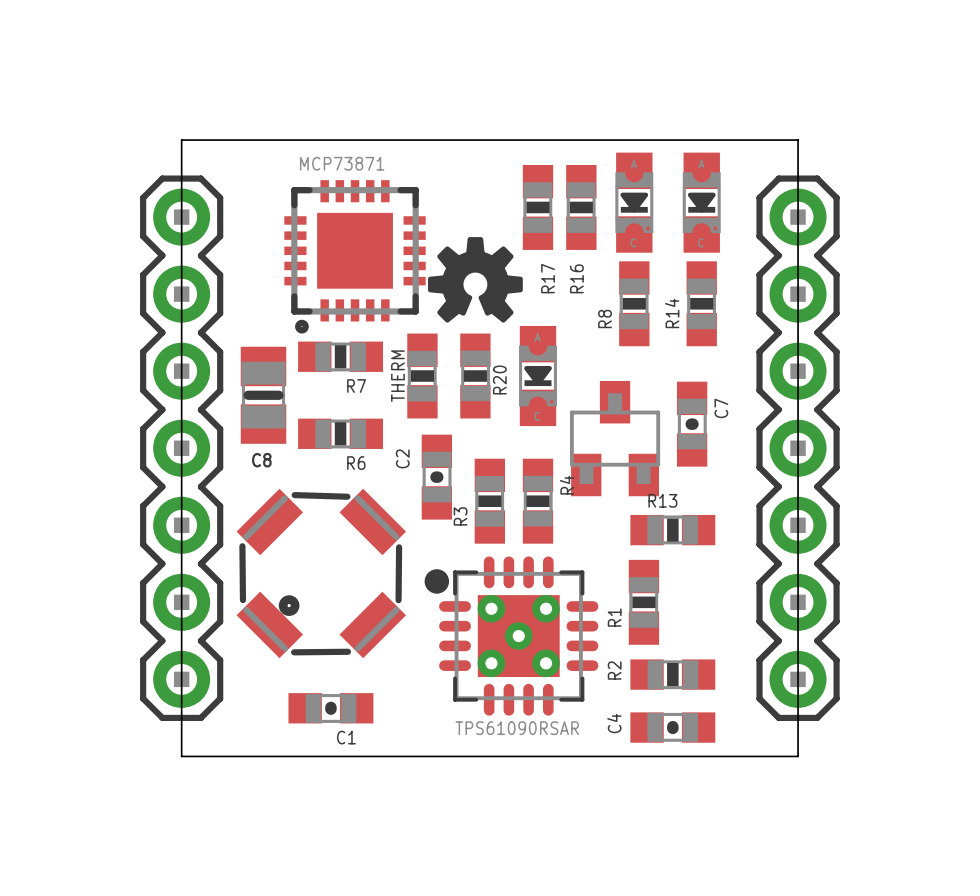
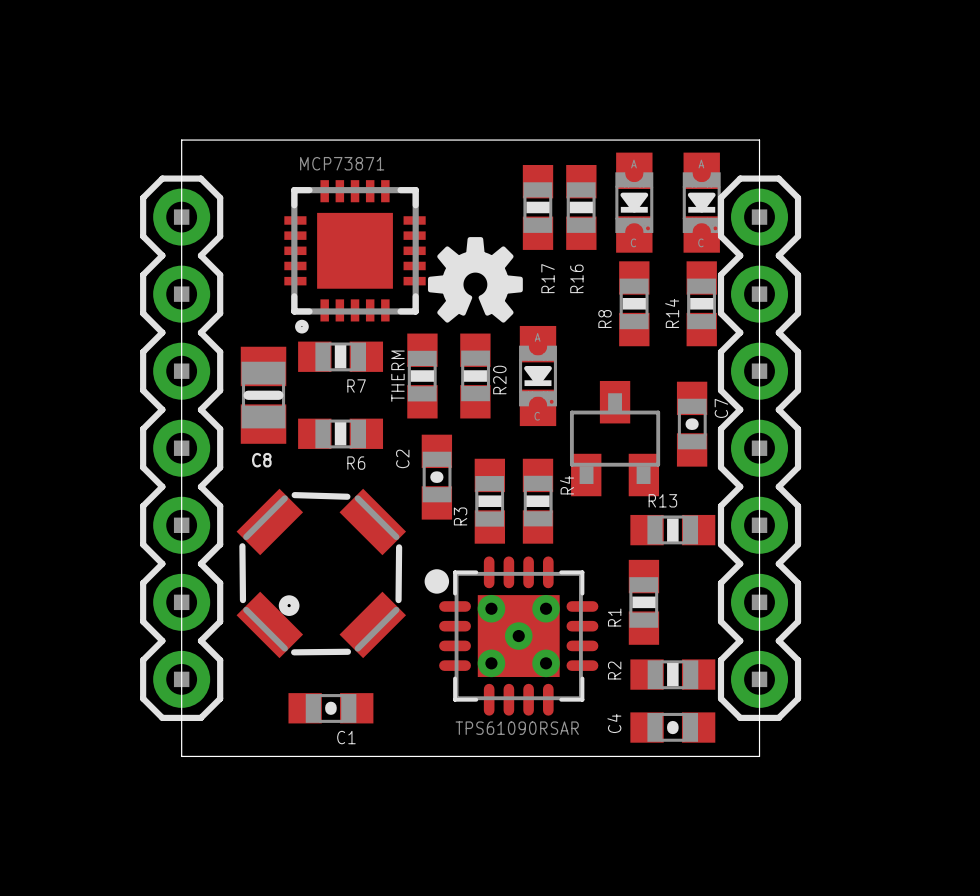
board edge: (759, 140) (798, 140) (798, 756) (759, 756) -> (759, 140) (759, 756)
part position: (798, 448) -> (759, 448)

